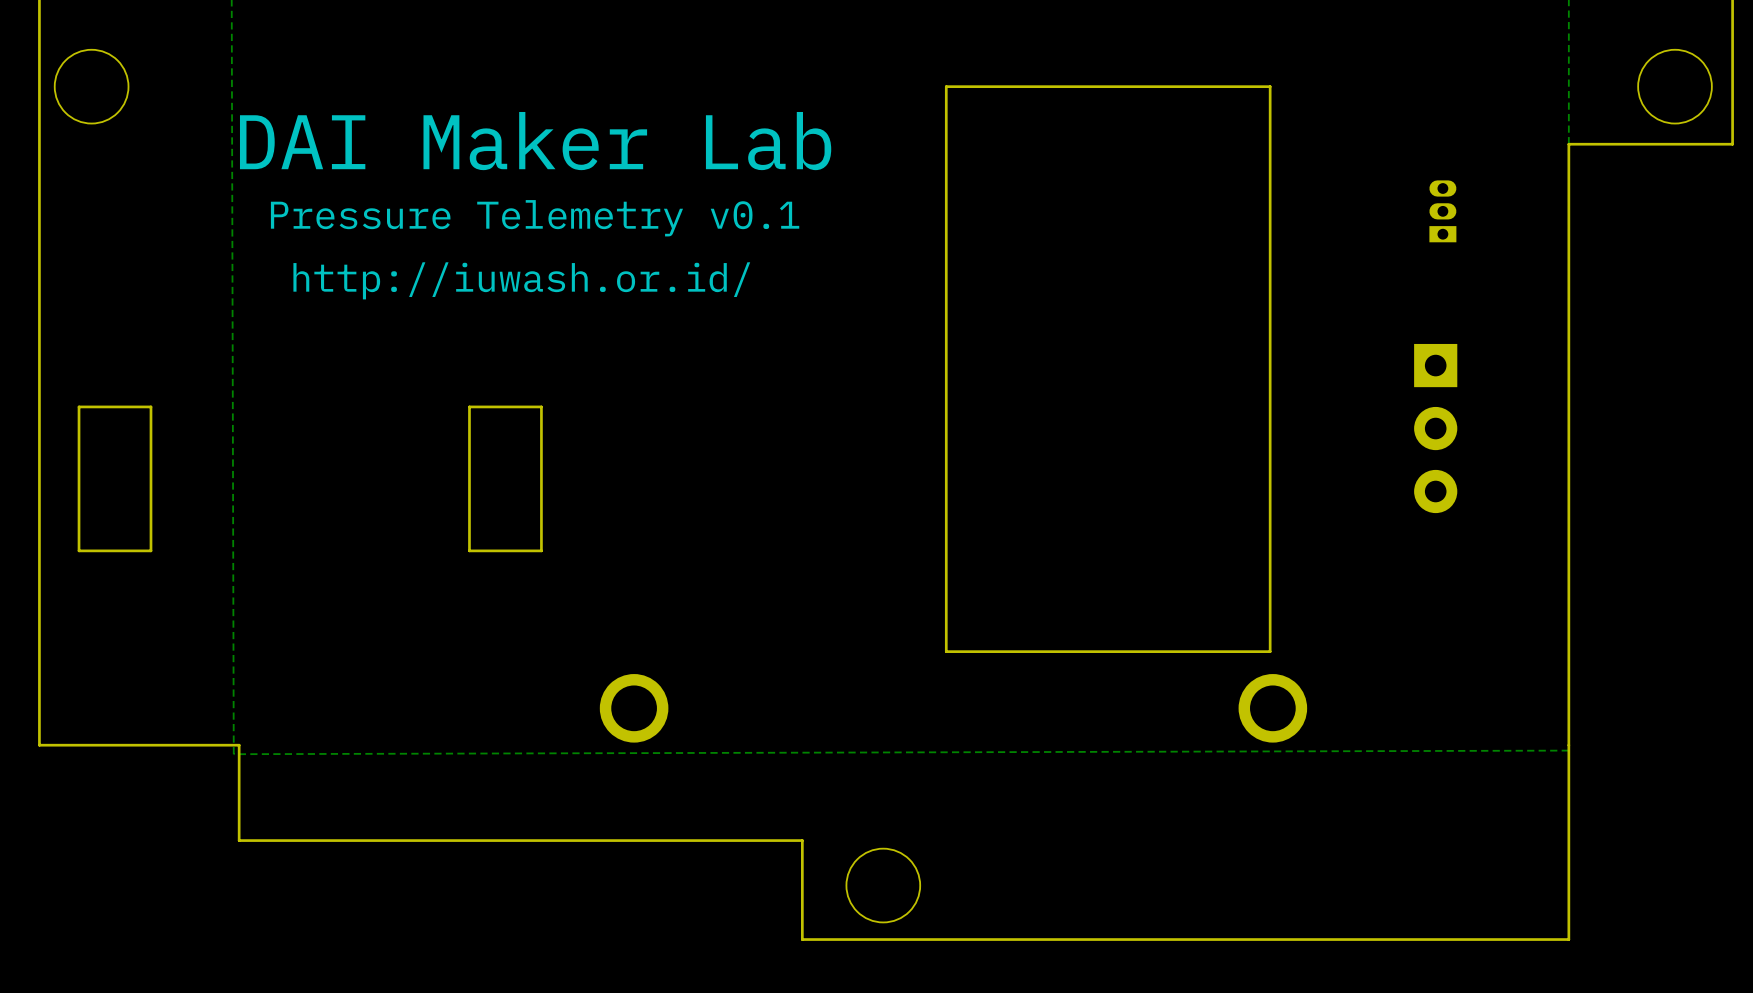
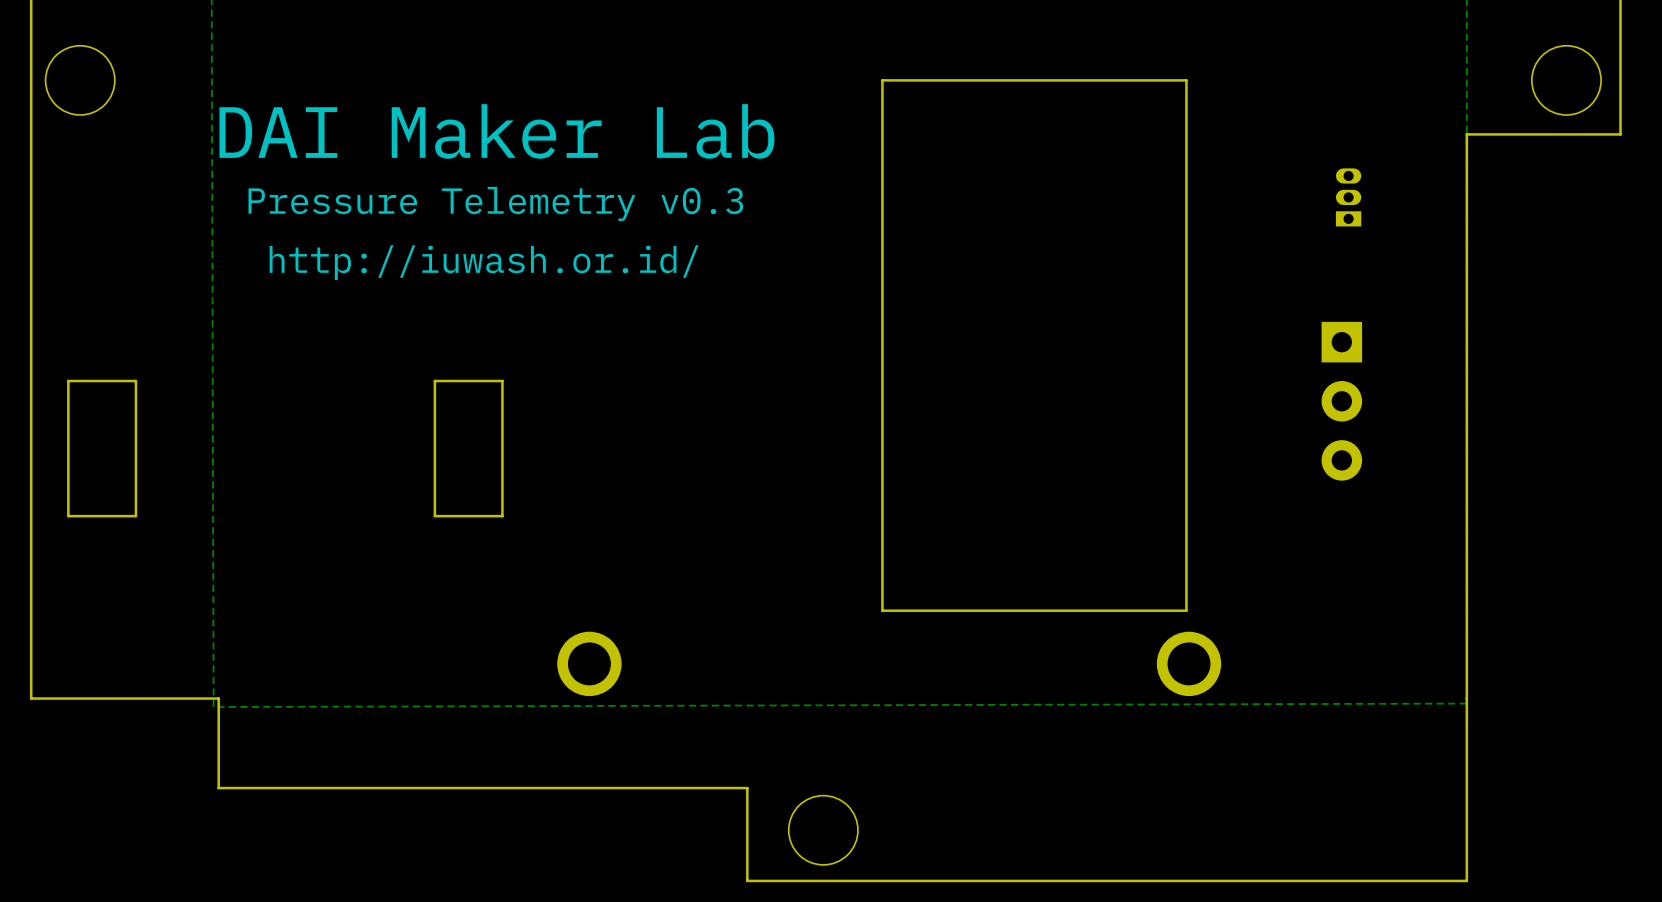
text: Pressure Telemetry v0.1 (535, 218) -> Pressure Telemetry v0.3 (495, 203)

